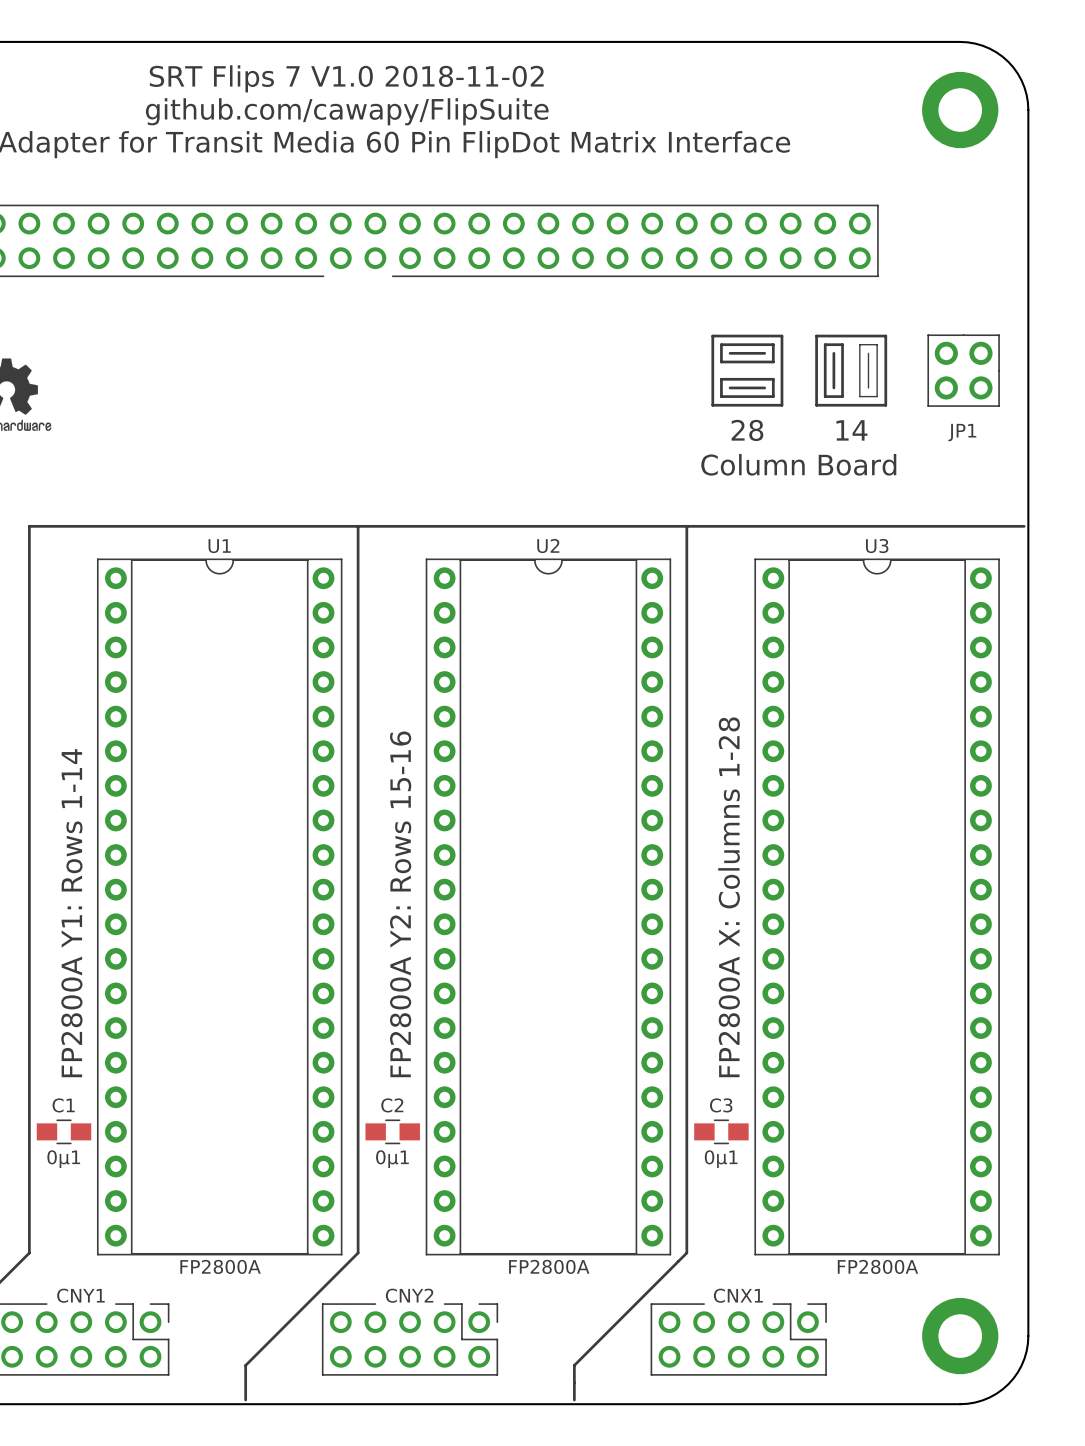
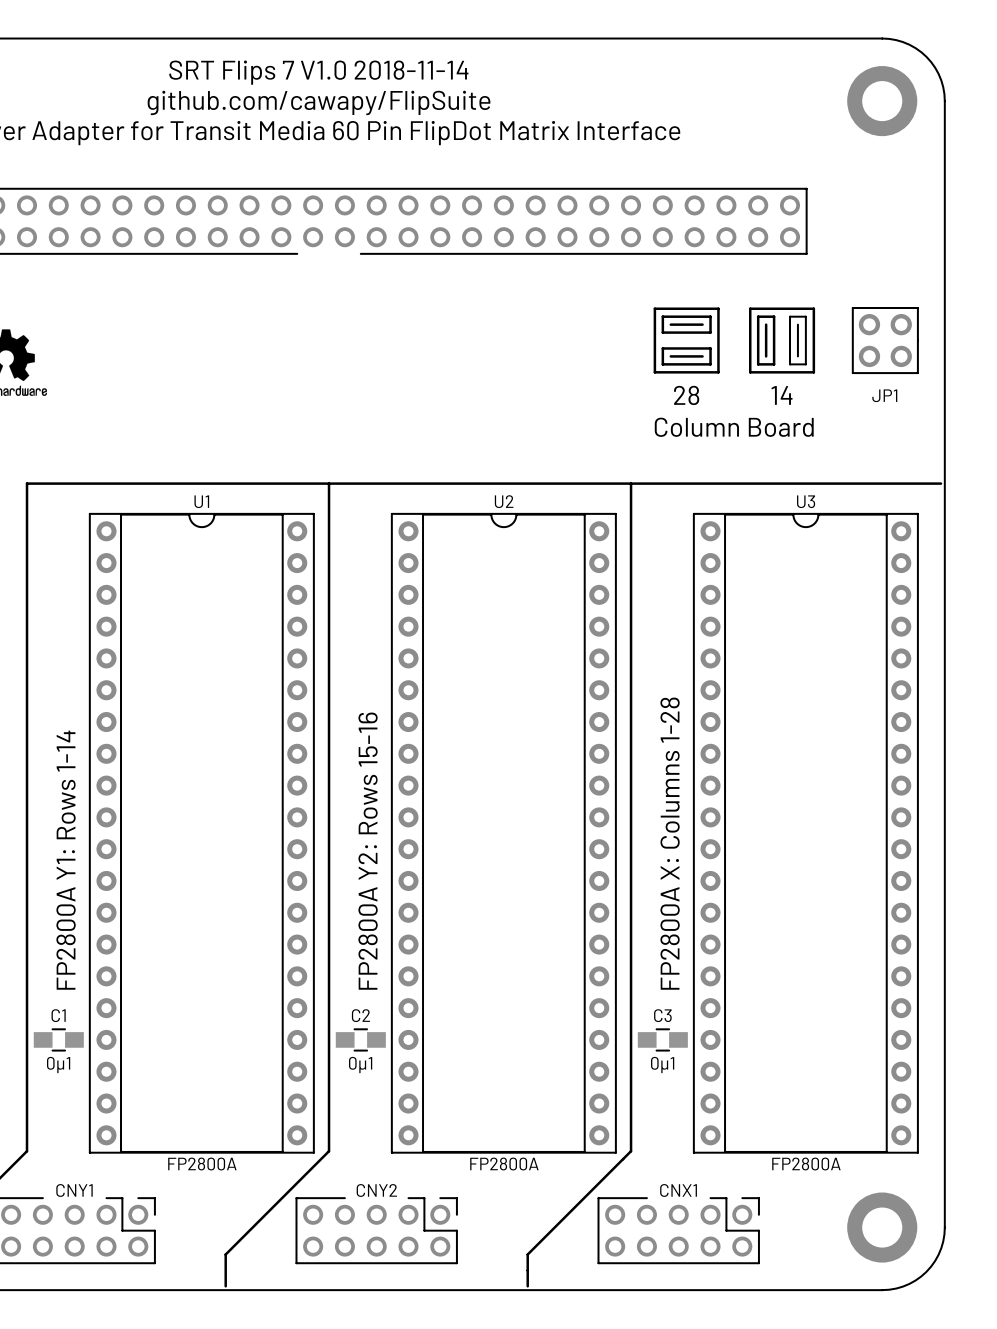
text: SRT Flips 7 V1.0 2018-11-02 (346, 78) -> SRT Flips 7 V1.0 2018-11-14 (318, 72)

